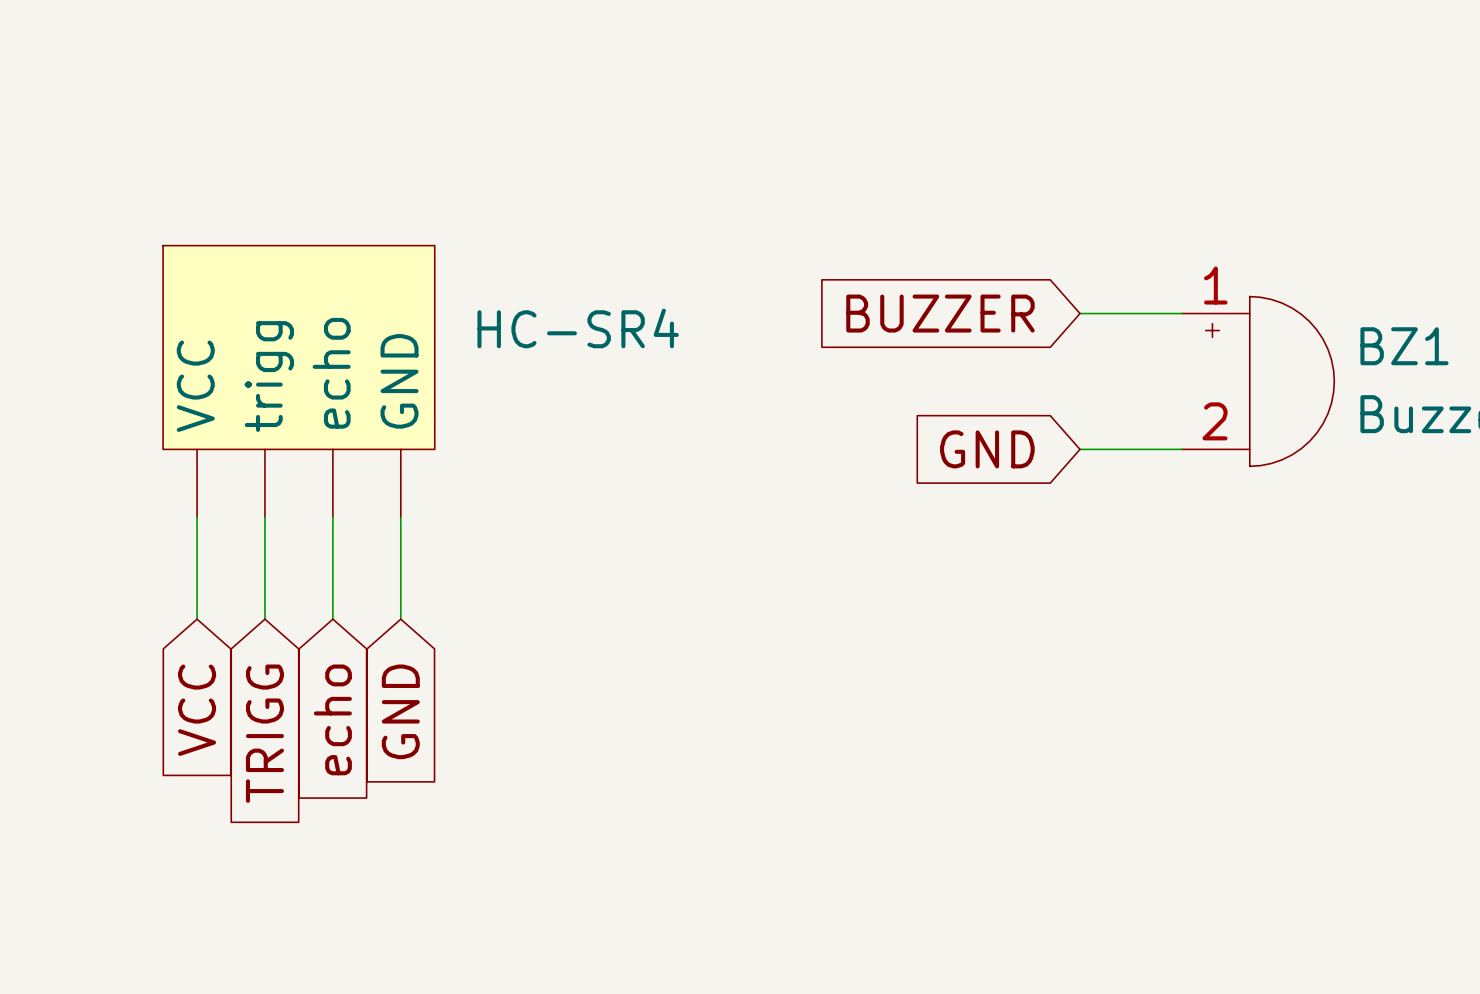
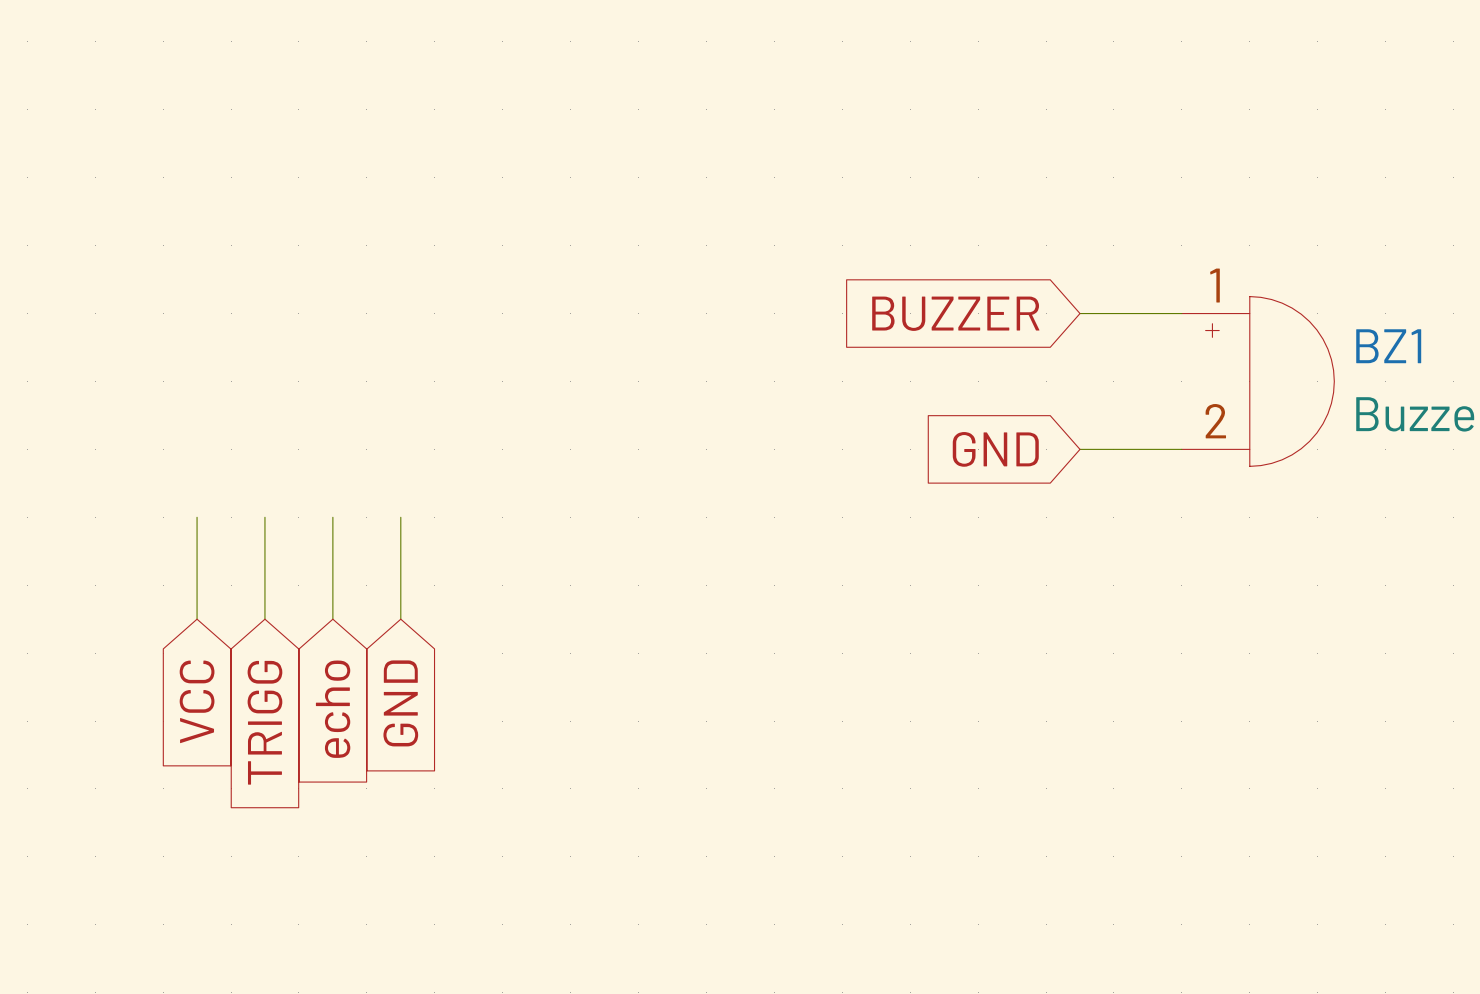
HC-SR4: (298, 381) -> none

